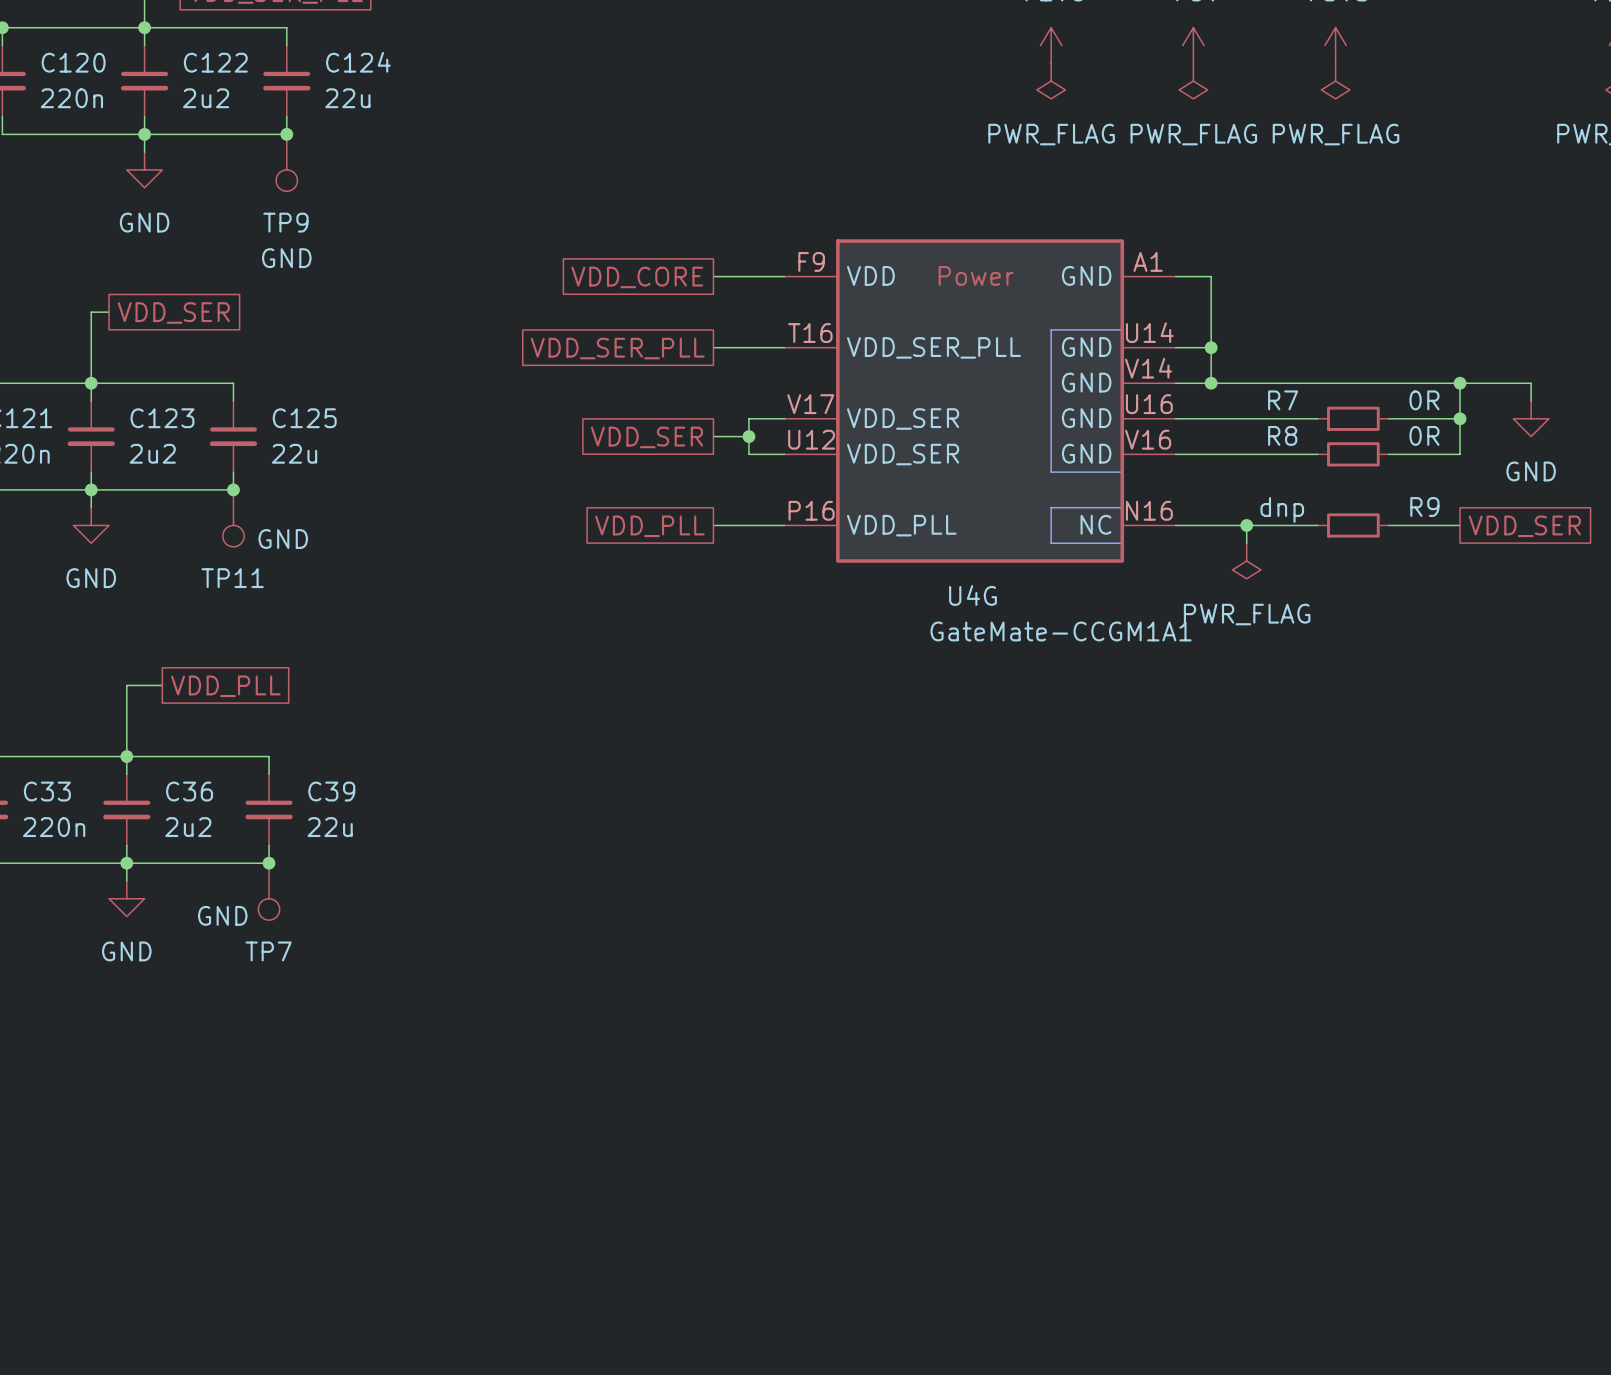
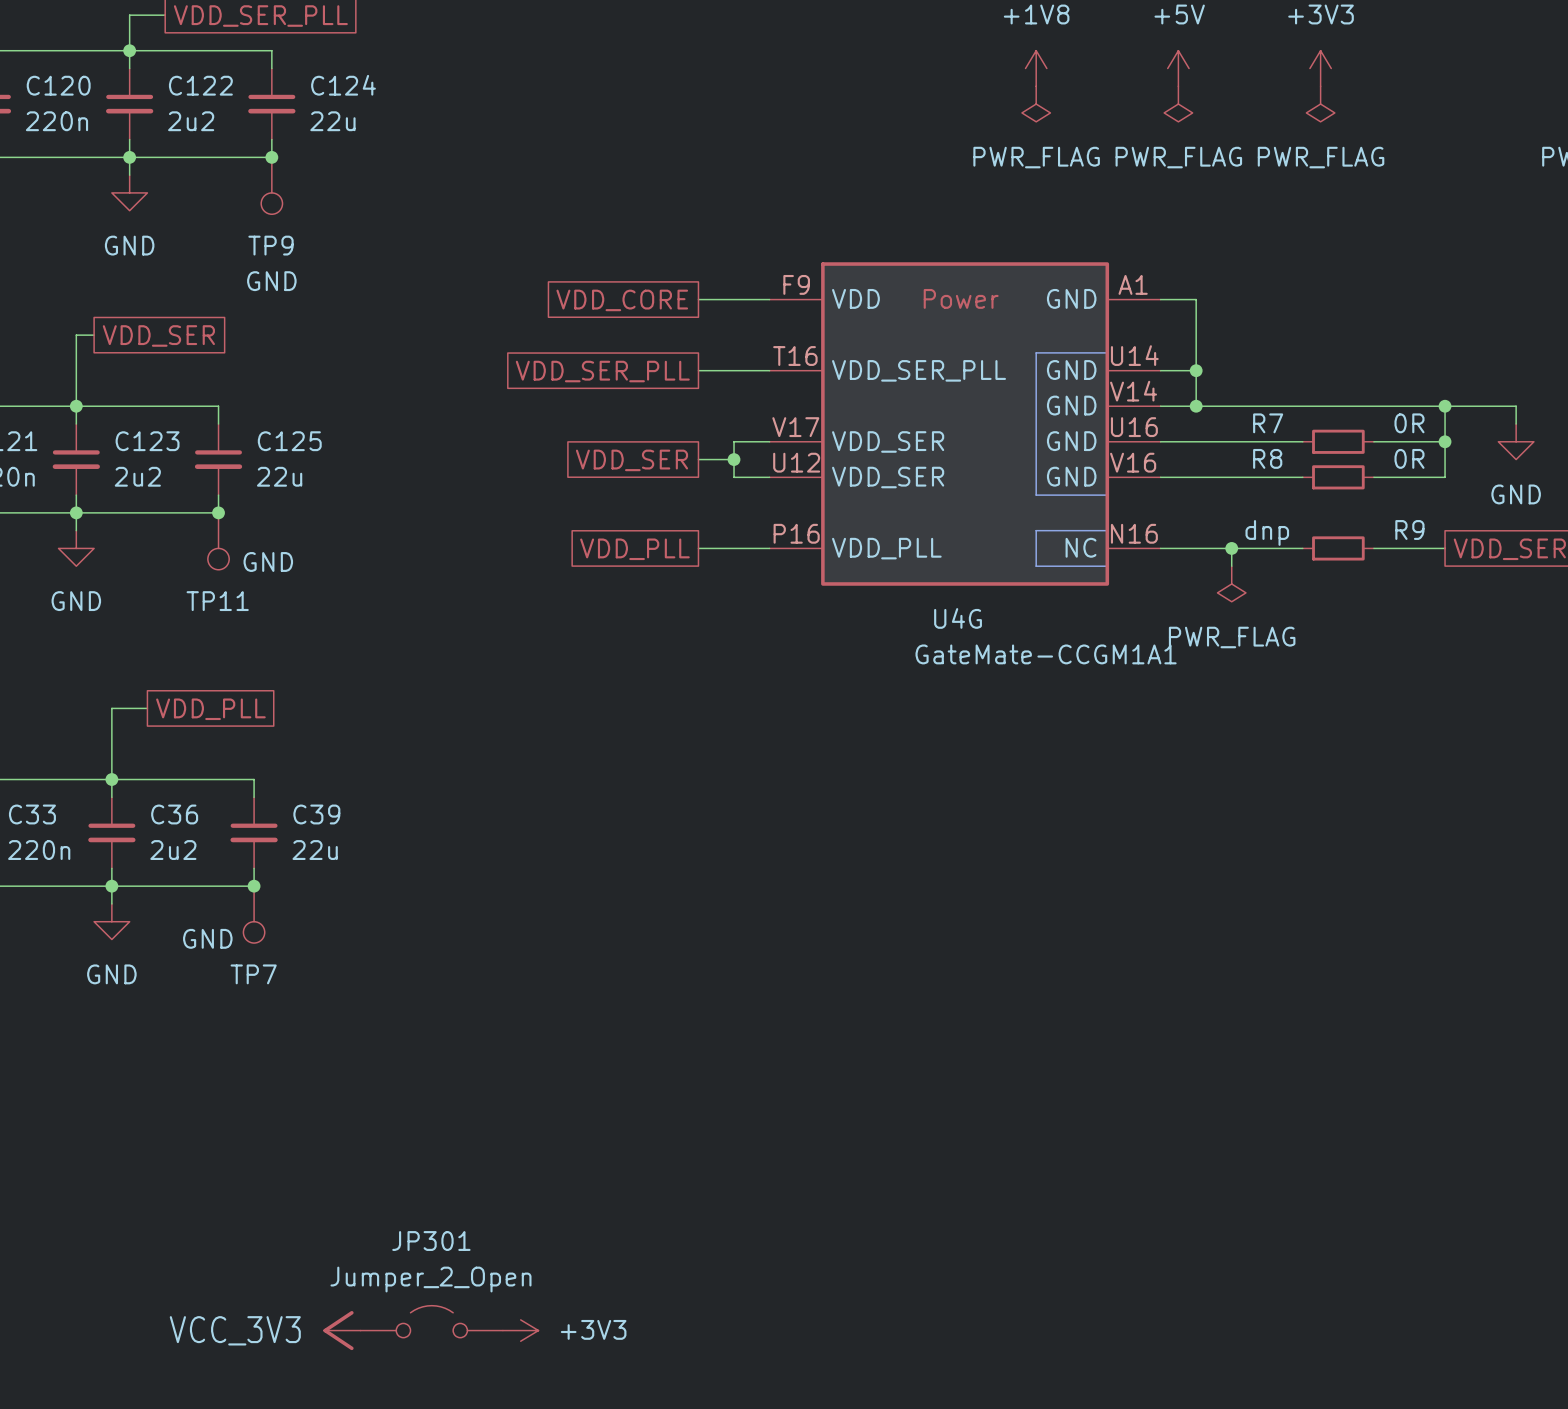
JP301: none -> Jumper_2_Open (431, 1321)
power symbol: none -> VCC_3V3 (342, 1330)
power symbol: none -> +3V3 (520, 1330)

